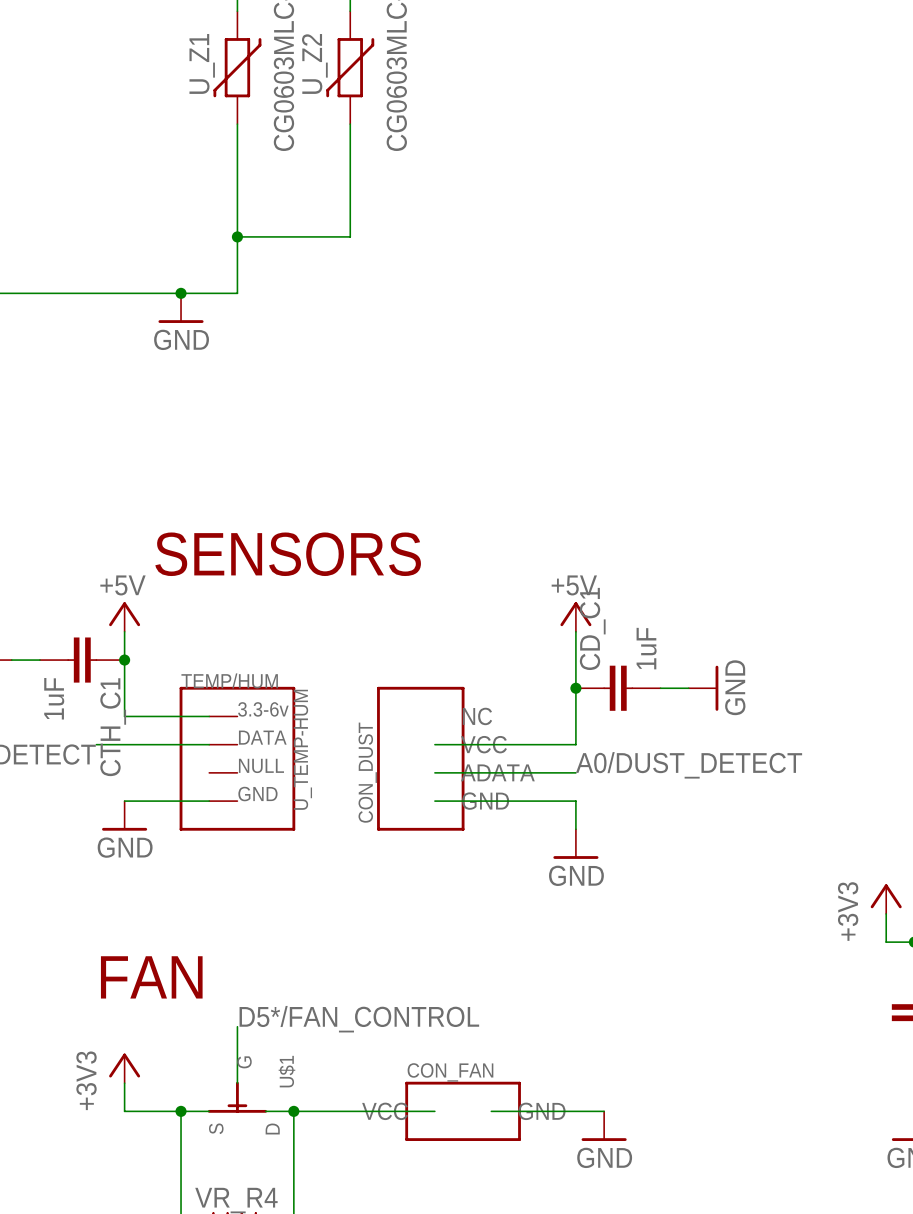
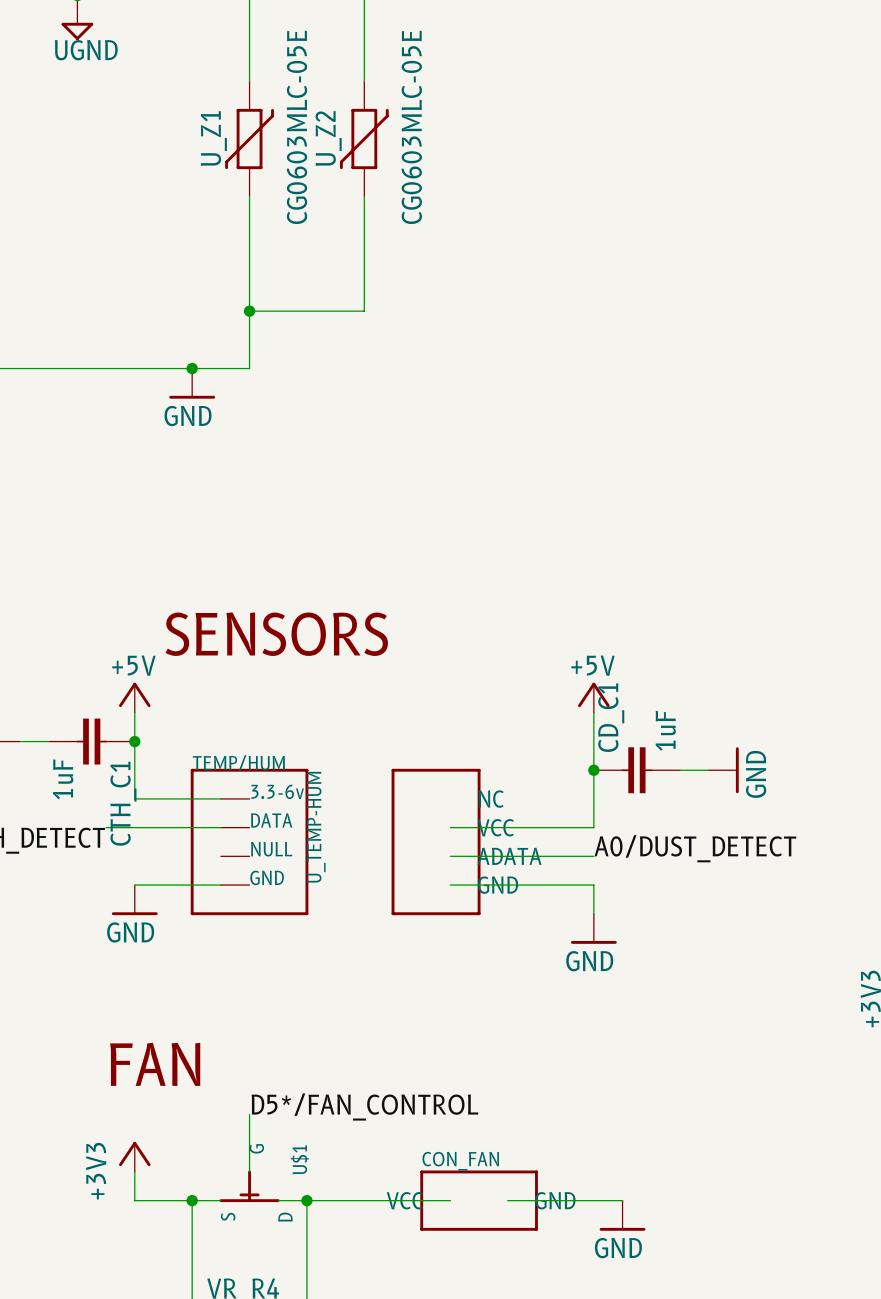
CON_DUST name: CON_DUST (367, 772) -> none

